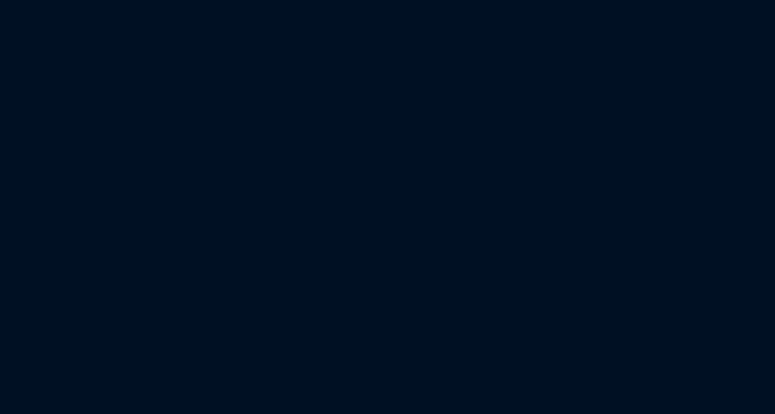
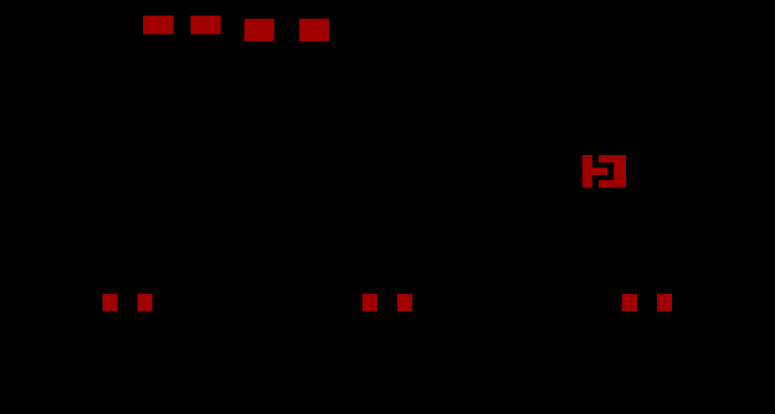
part: none -> (181, 24)
part: none -> (286, 29)
part: none -> (604, 171)
part: none -> (127, 302)
part: none -> (387, 302)
part: none -> (647, 302)

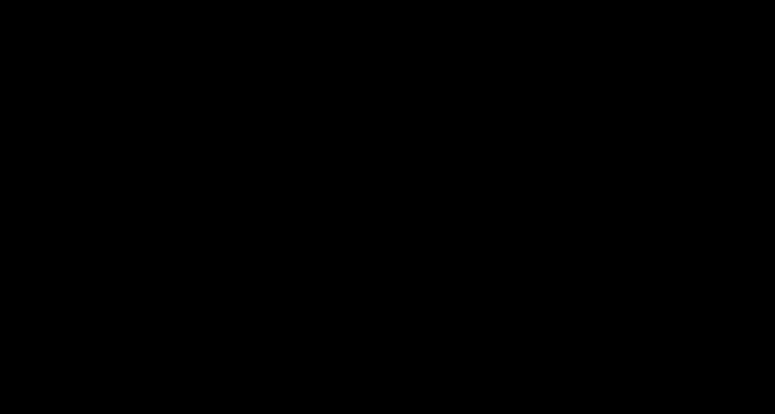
part: (181, 24) -> none
part: (286, 29) -> none
part: (604, 171) -> none
part: (127, 302) -> none
part: (387, 302) -> none
part: (647, 302) -> none

